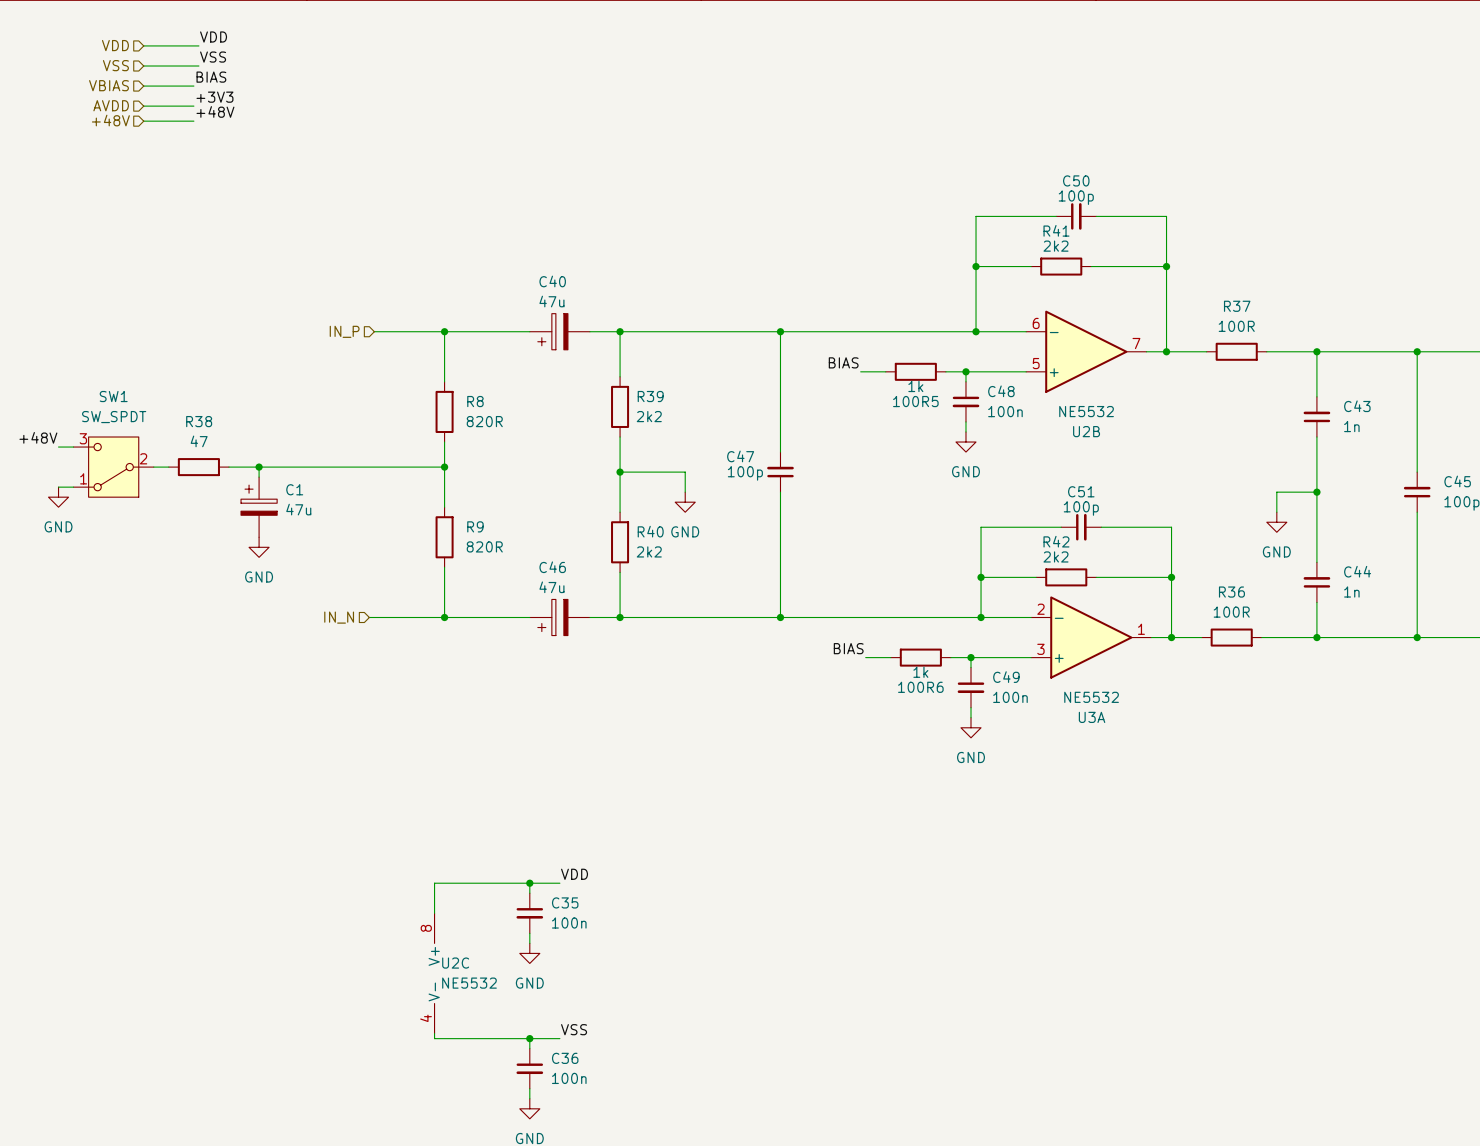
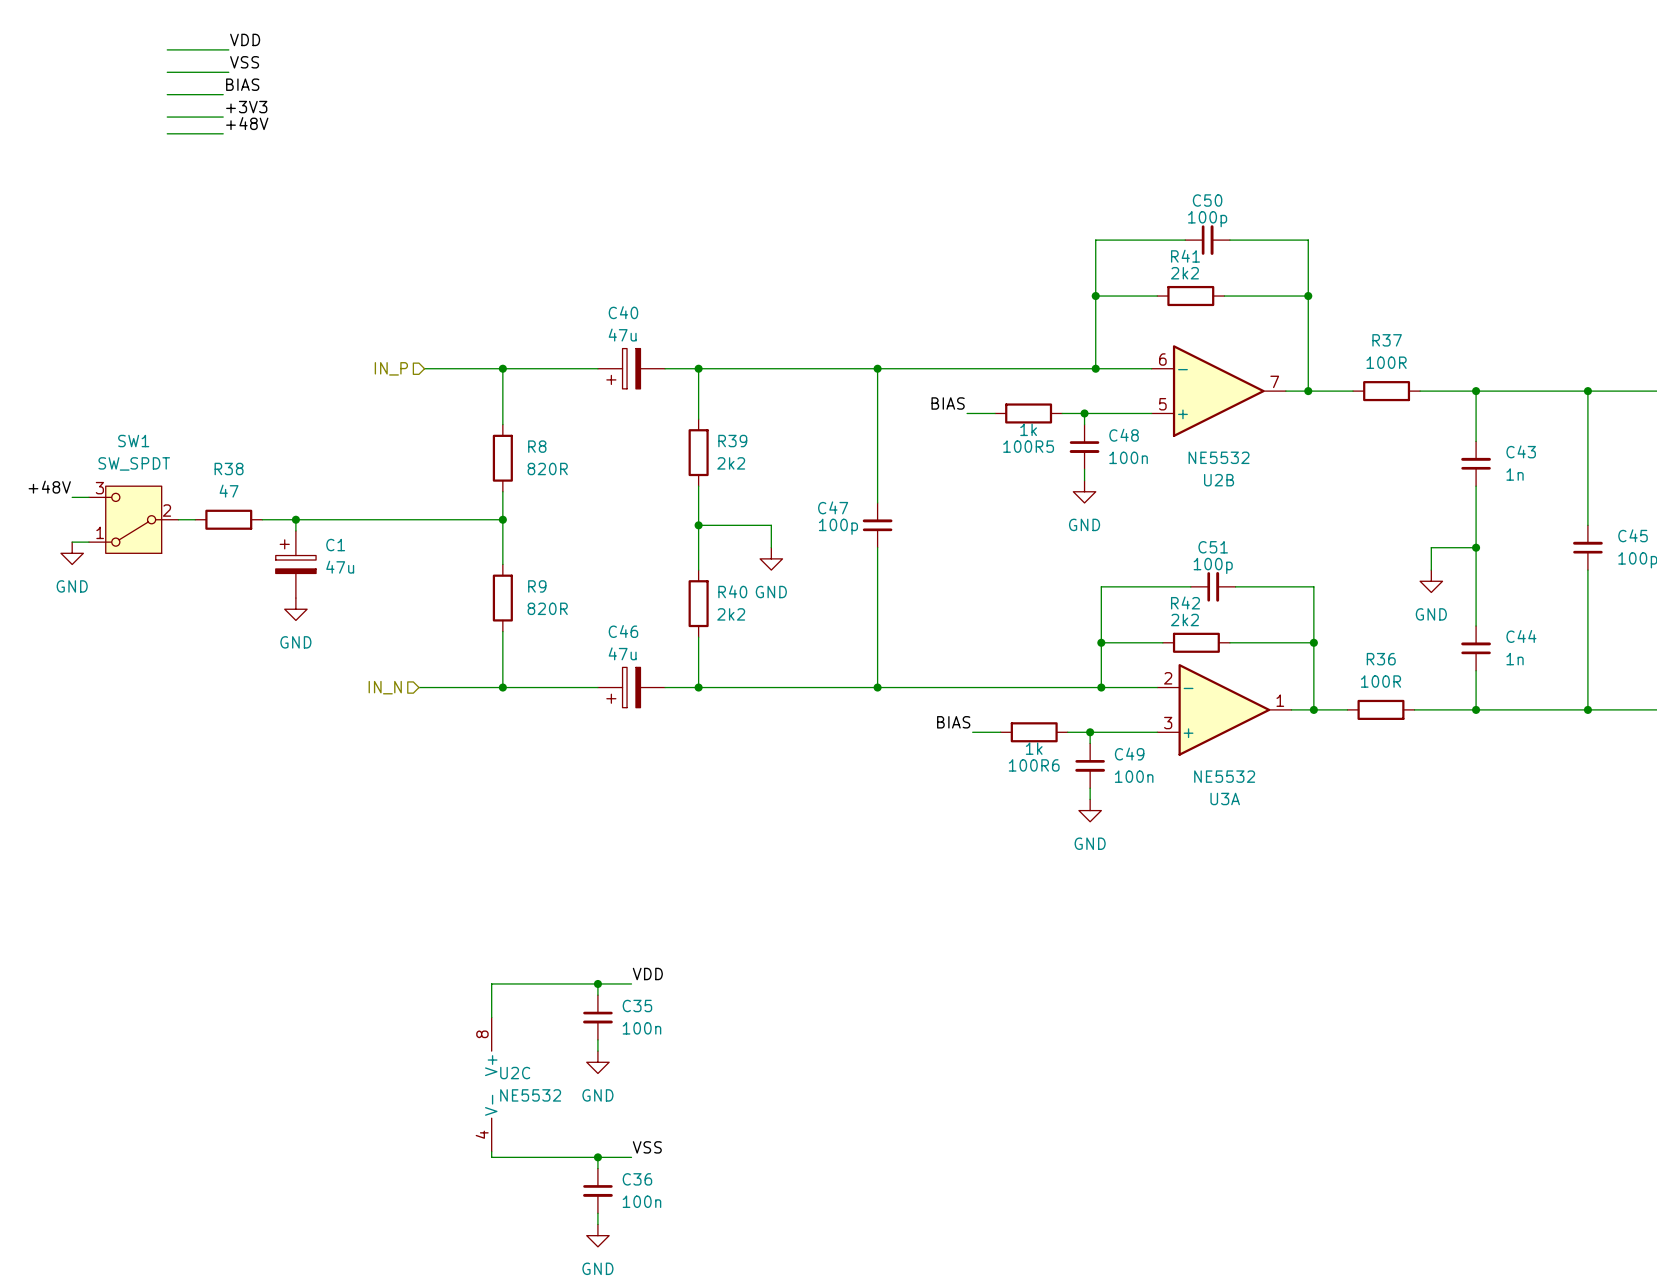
hierarchical label: VDD (115, 45) -> none
hierarchical label: VSS (115, 65) -> none
hierarchical label: VBIAS (108, 85) -> none
hierarchical label: AVDD (111, 105) -> none
hierarchical label: +48V (110, 120) -> none

